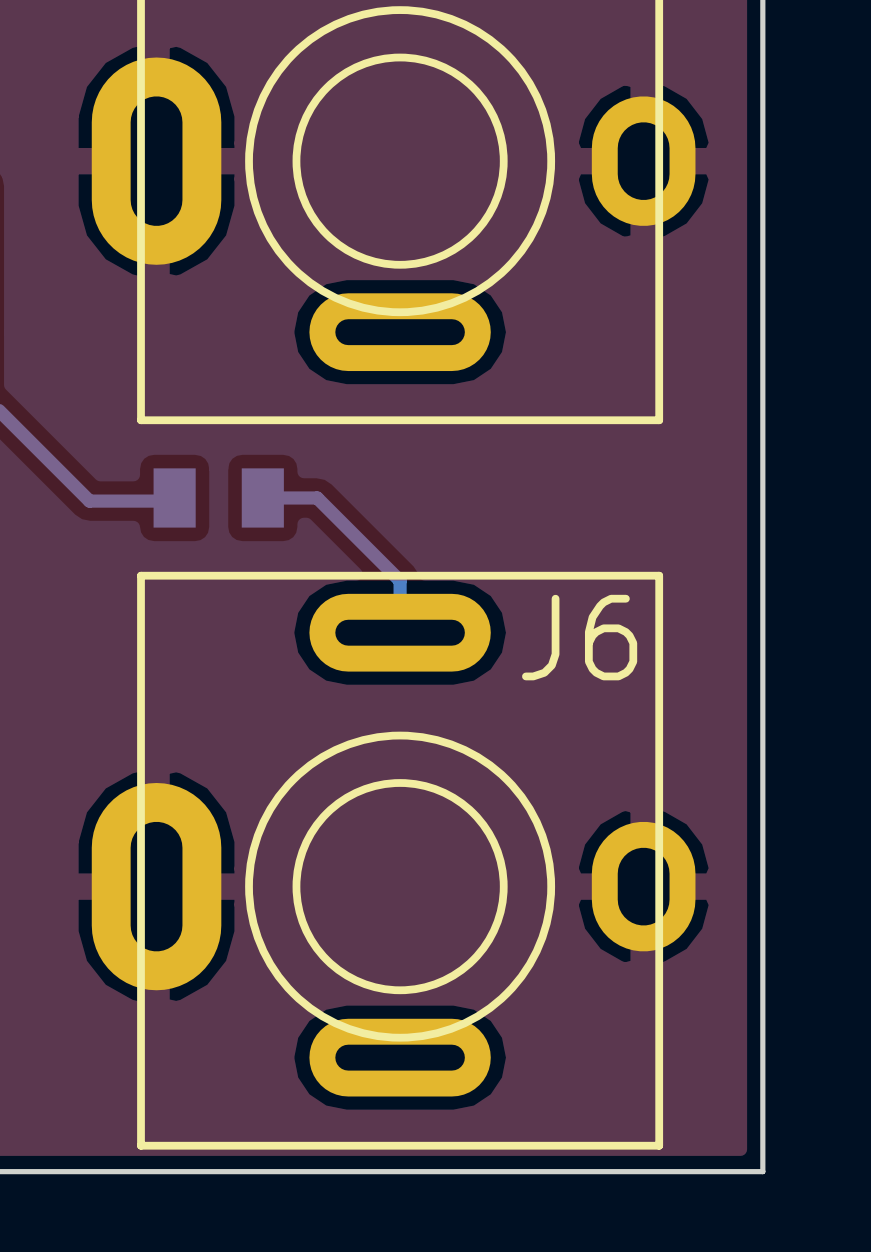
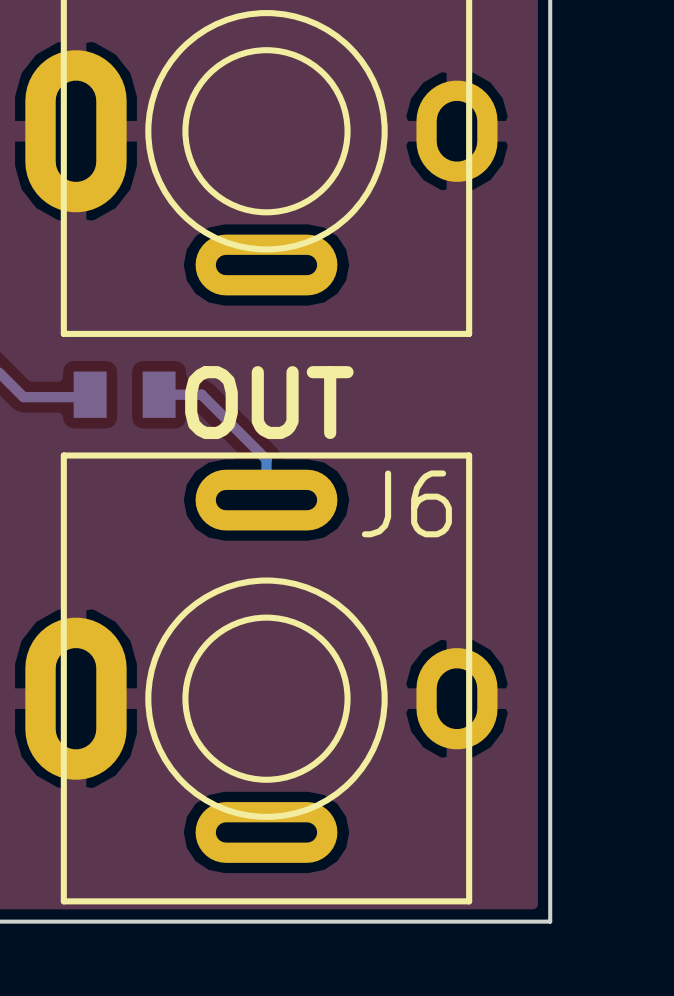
text: none -> OUT (269, 402)

